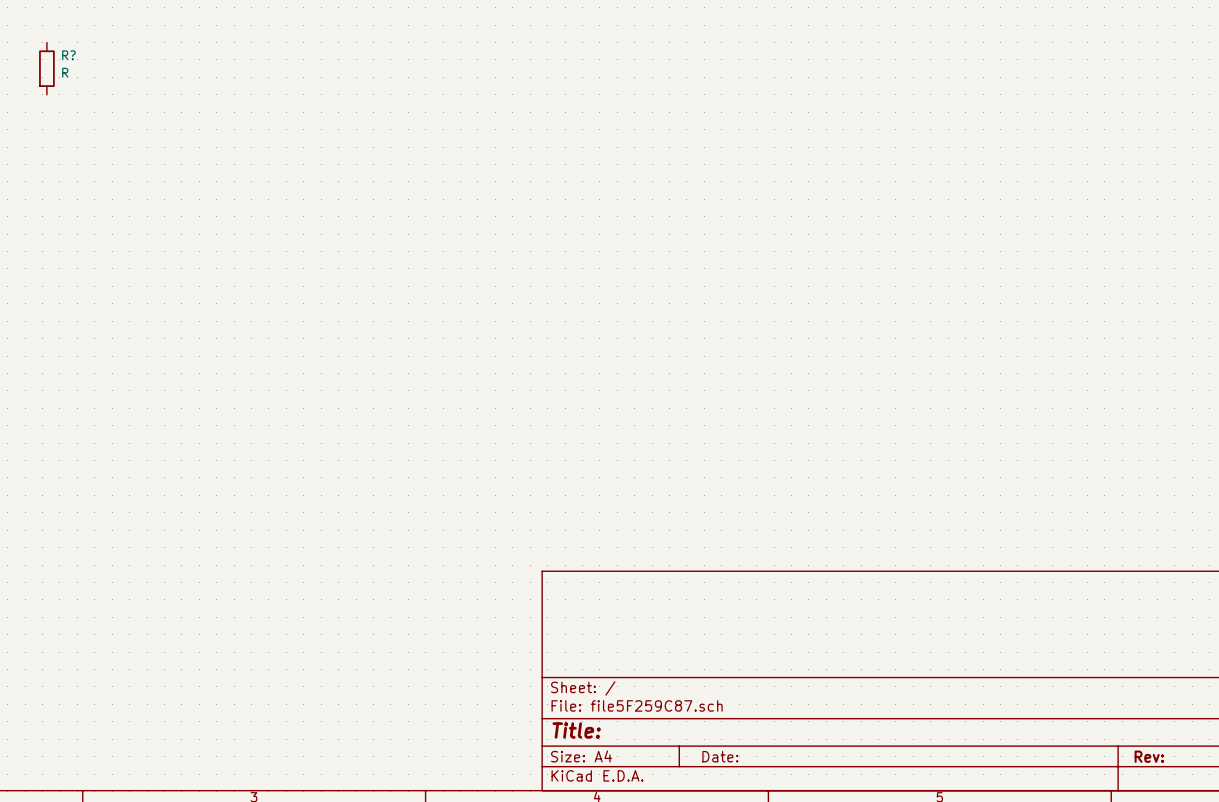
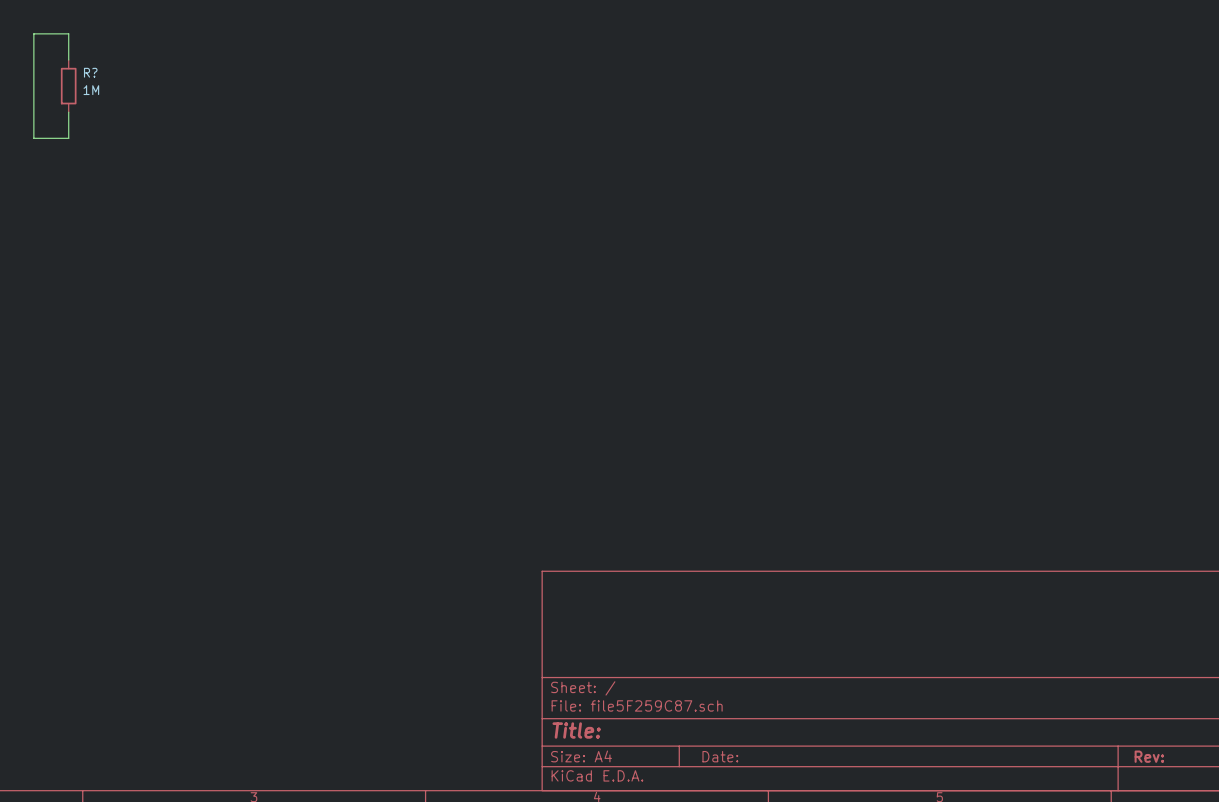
wire: none -> (68, 59) (68, 33) (33, 33) (33, 138) (68, 138) (68, 112)
R?: R (46, 68) -> none
R?: none -> 1M (68, 86)

